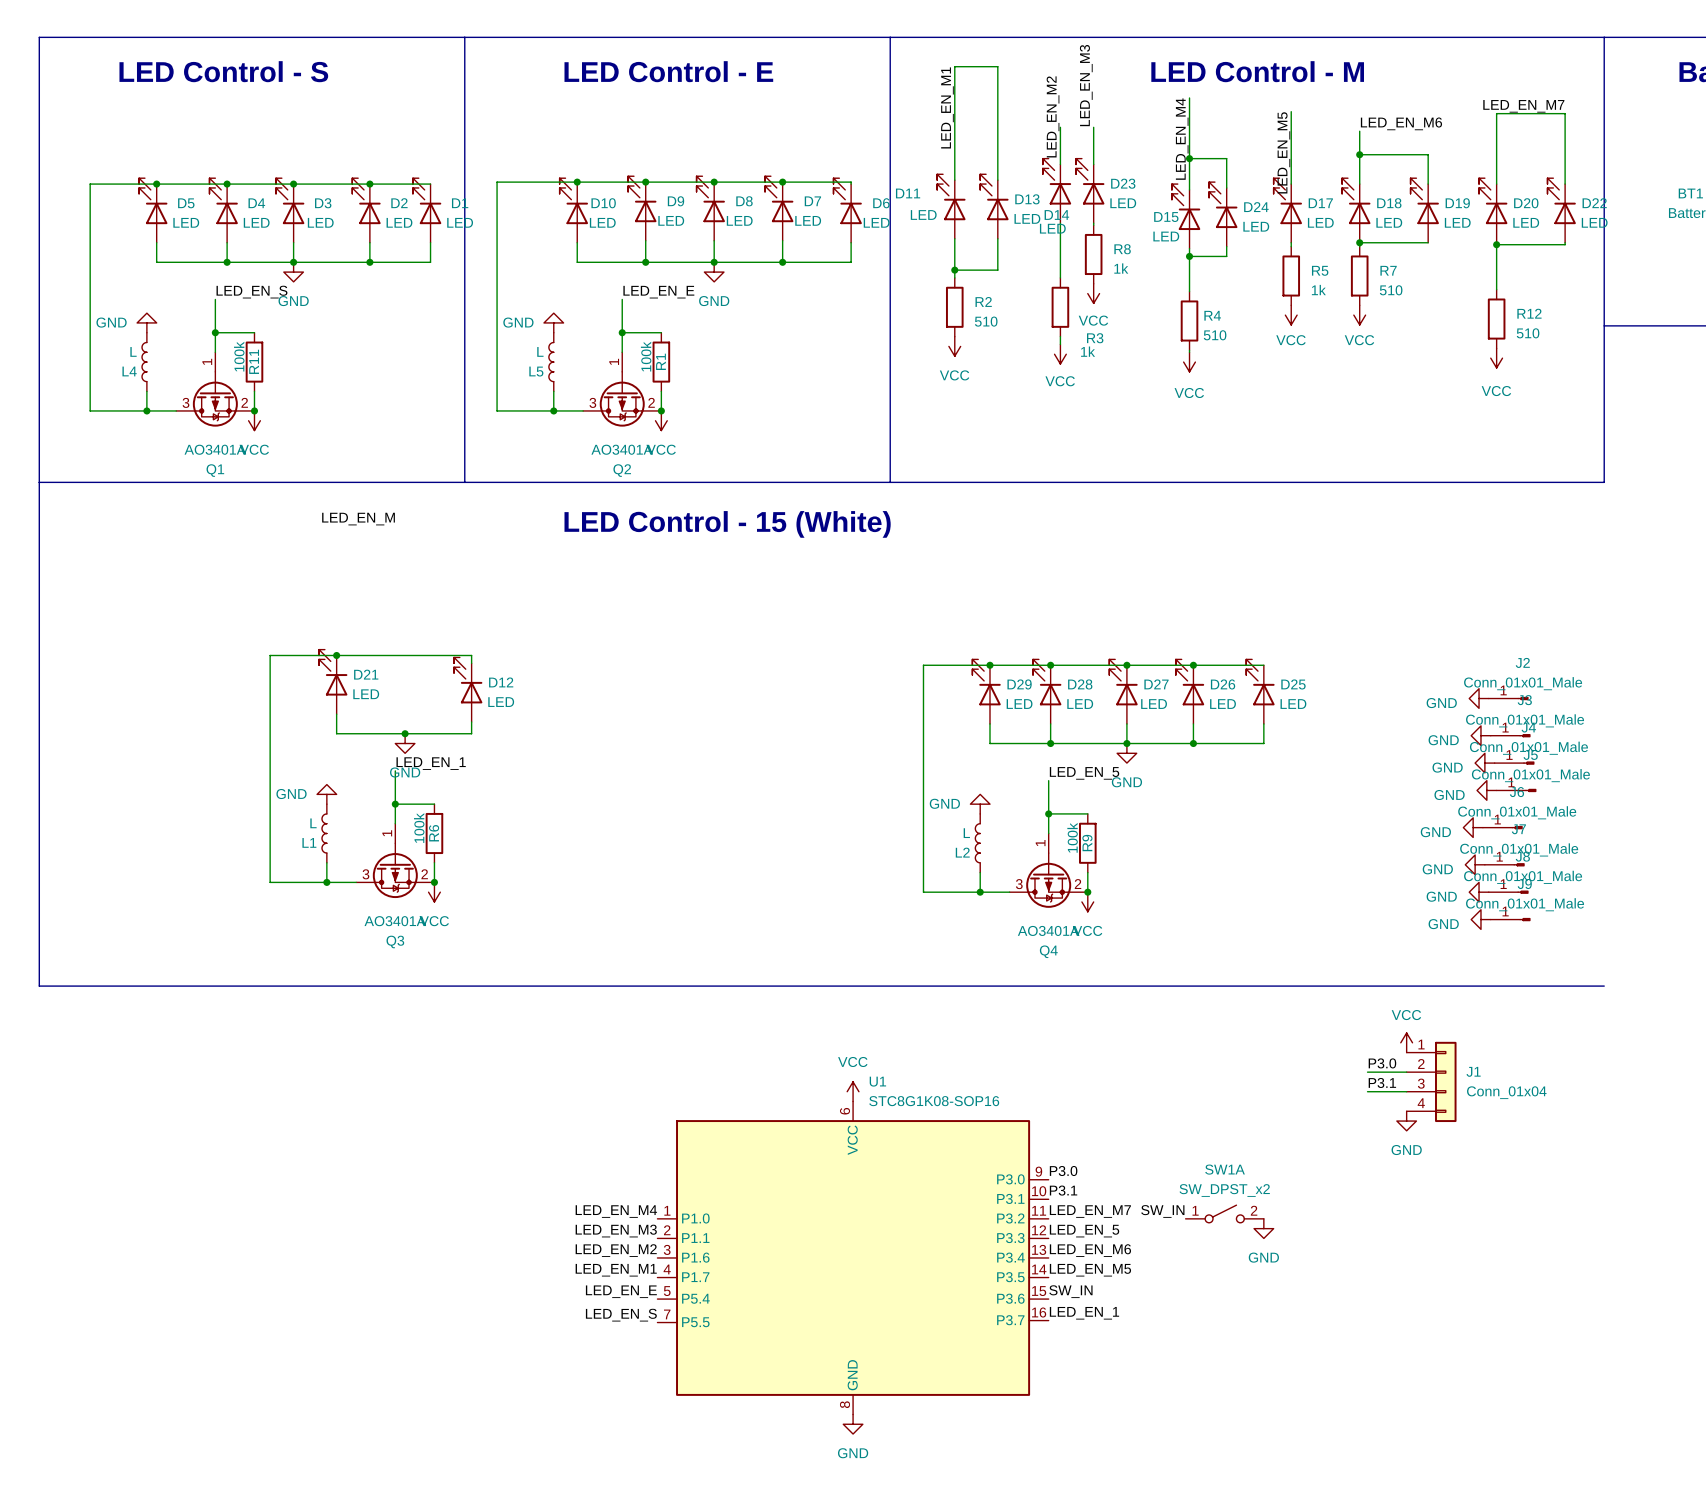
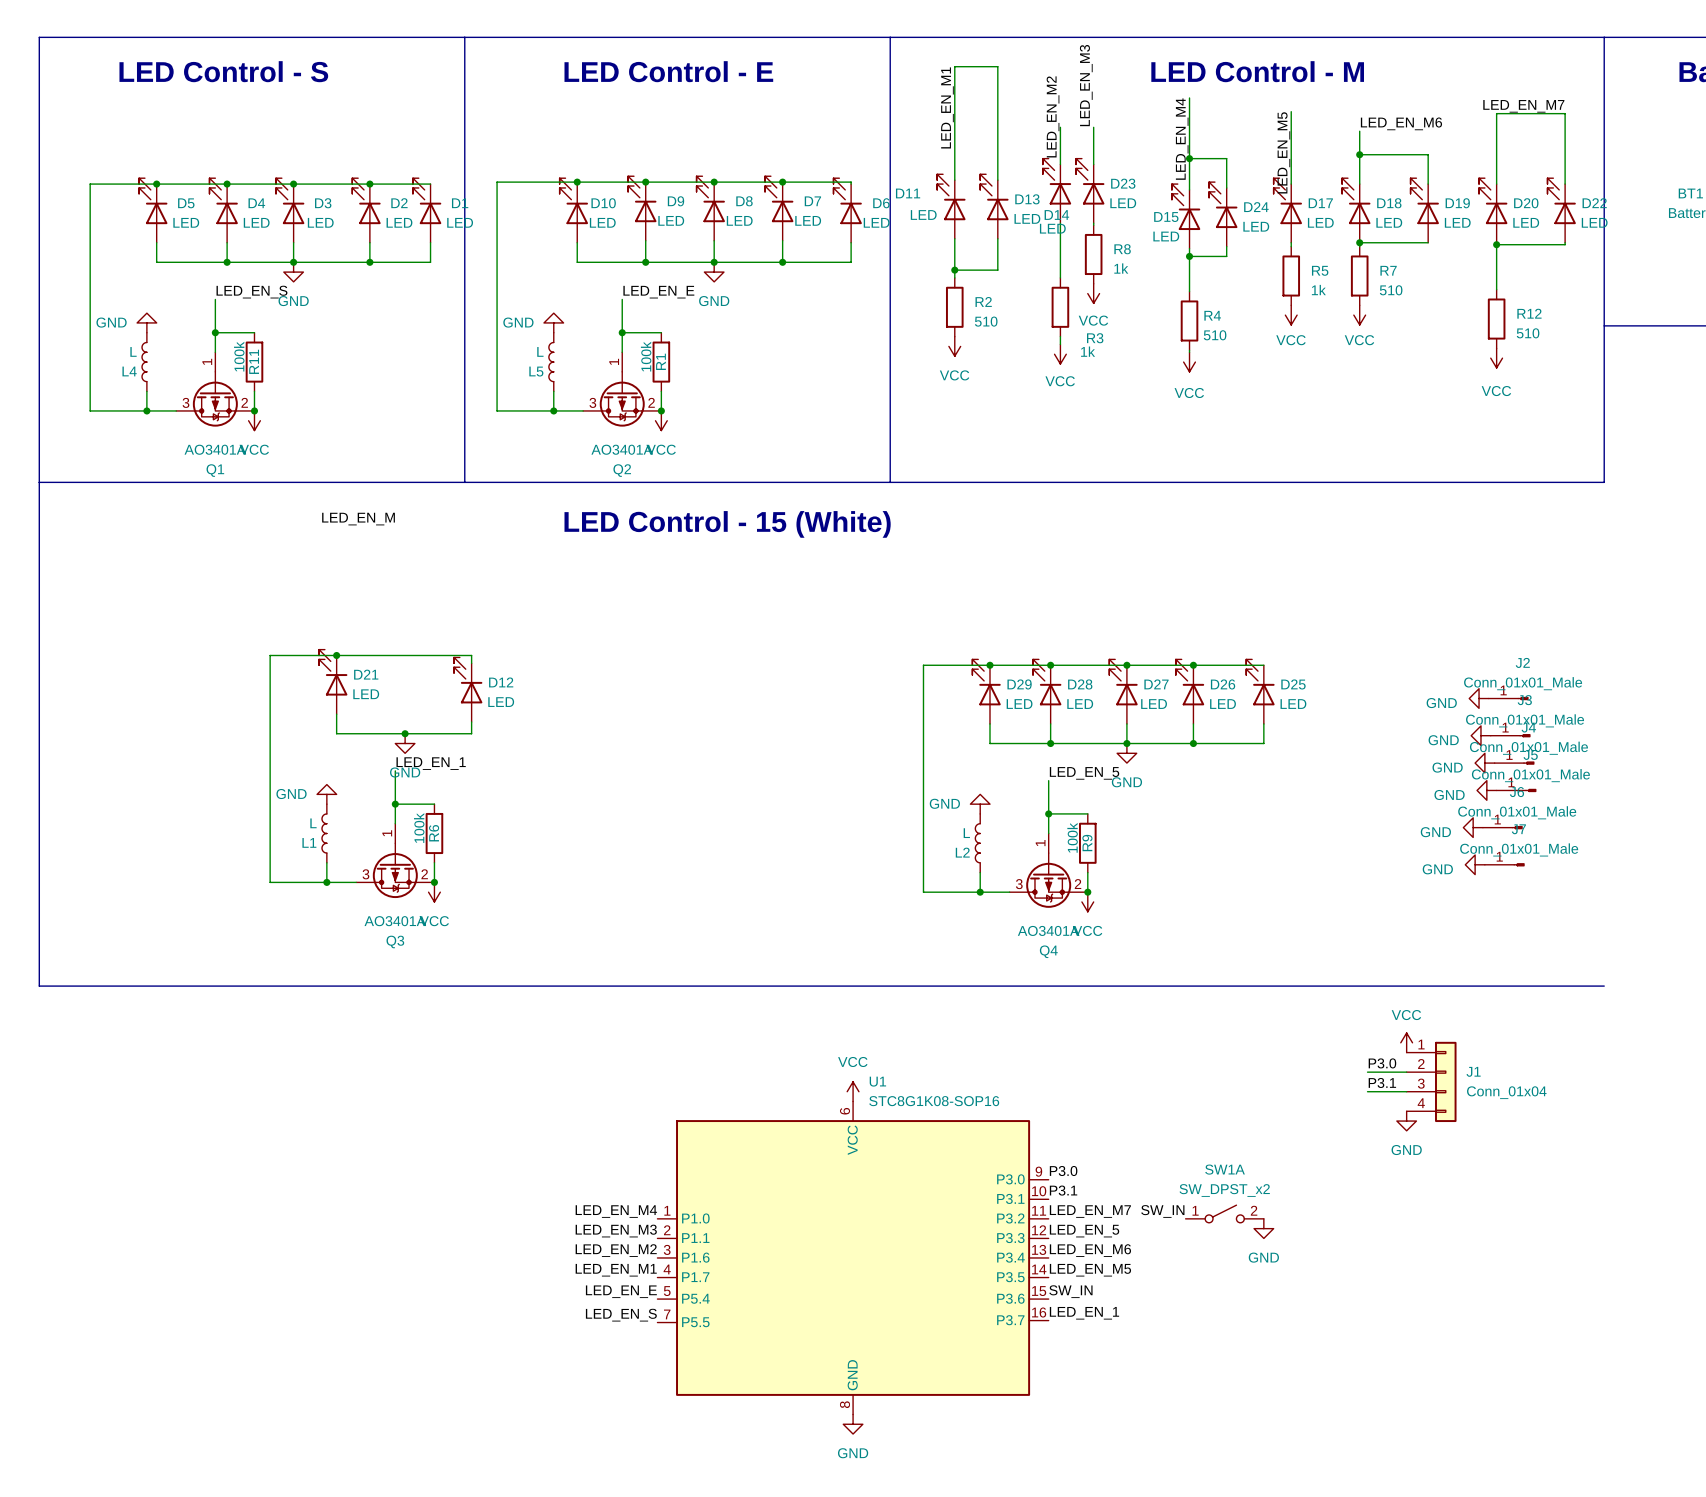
power symbol: GND (1479, 892) -> none
J8: Conn_01x01_Male (1508, 892) -> none
power symbol: GND (1480, 919) -> none
J9: Conn_01x01_Male (1510, 919) -> none

